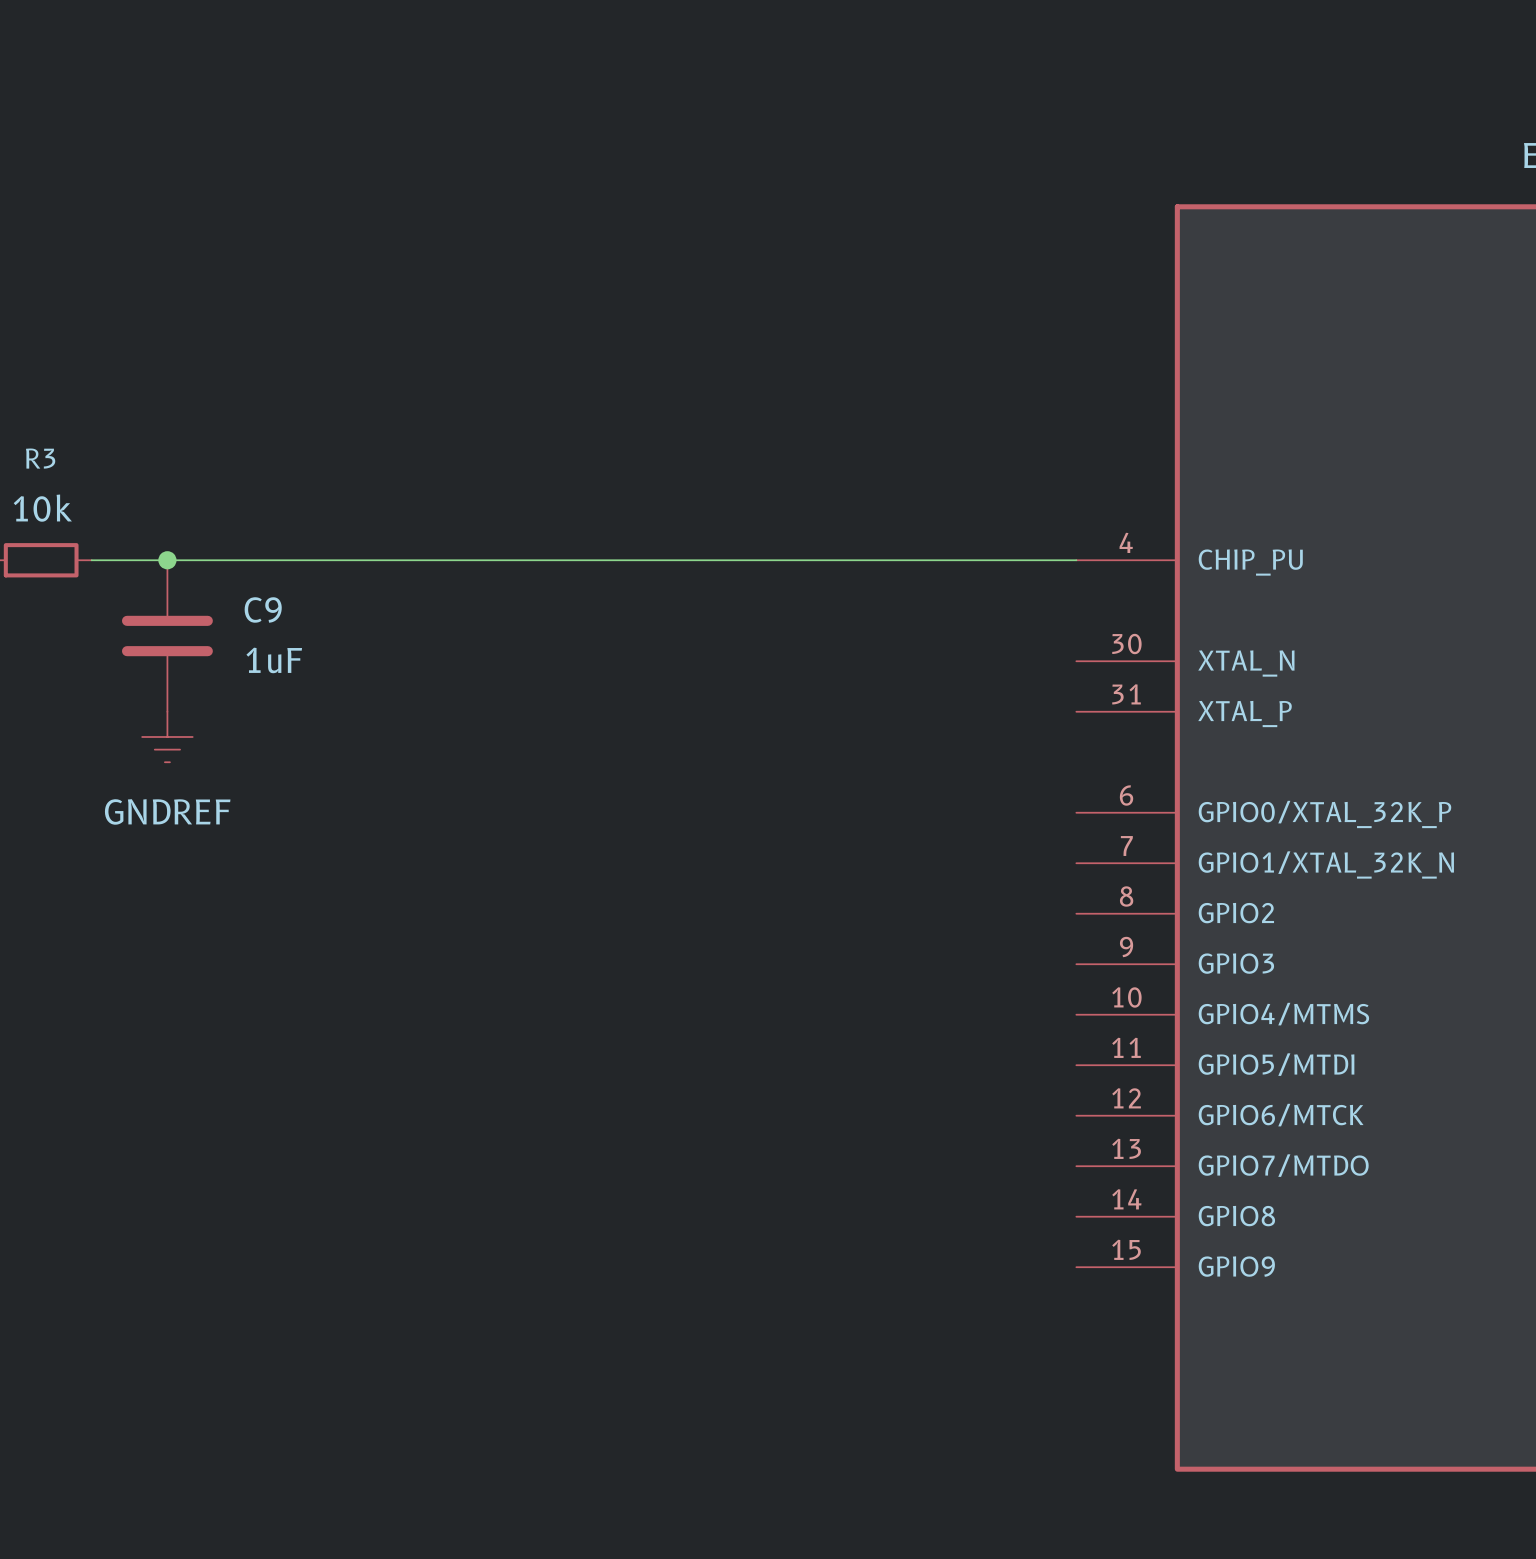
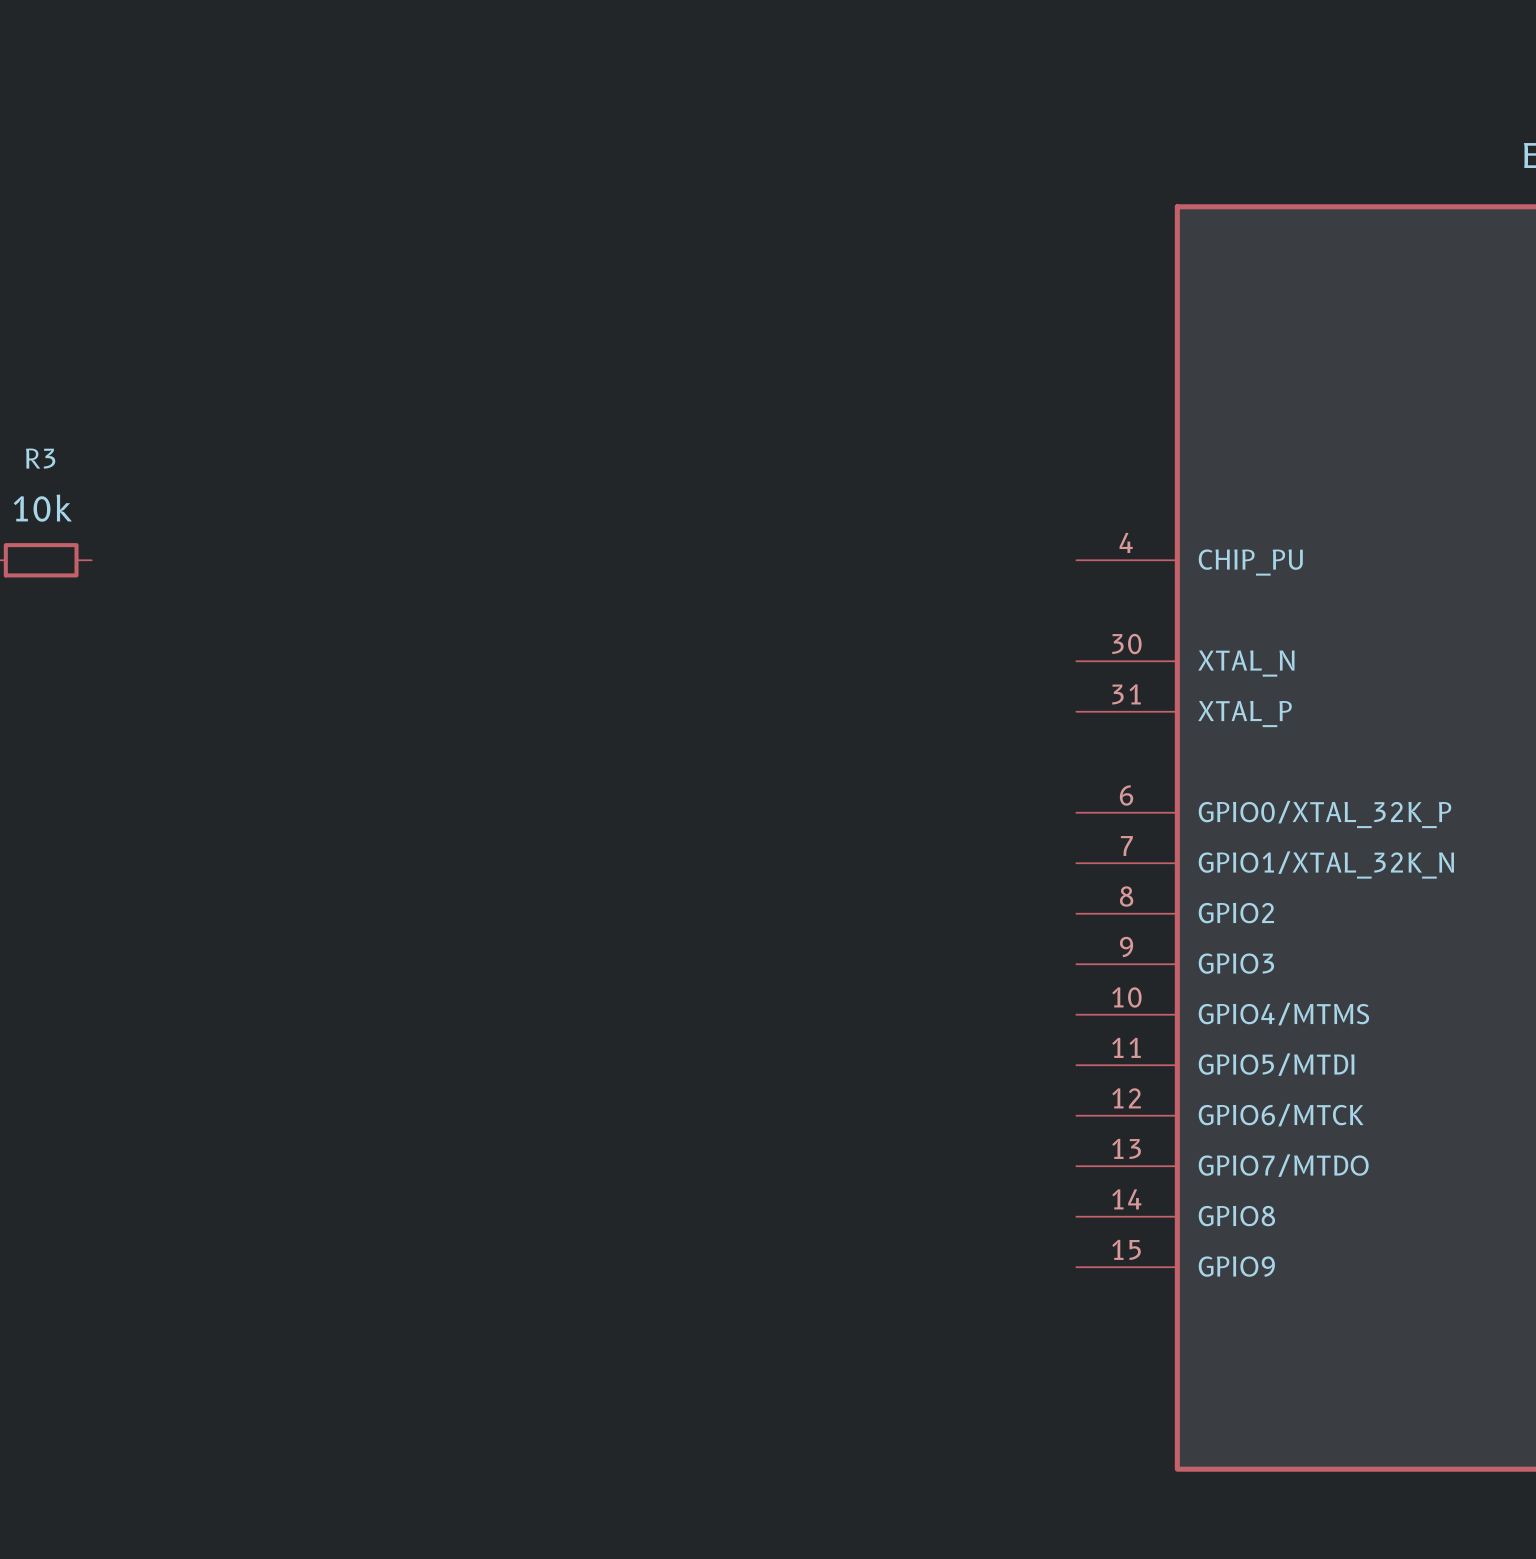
wire: (91, 560) (1076, 560) -> none
junction: (167, 560) -> none
C9: 1uF (167, 636) -> none
power symbol: GNDREF (167, 737) -> none

